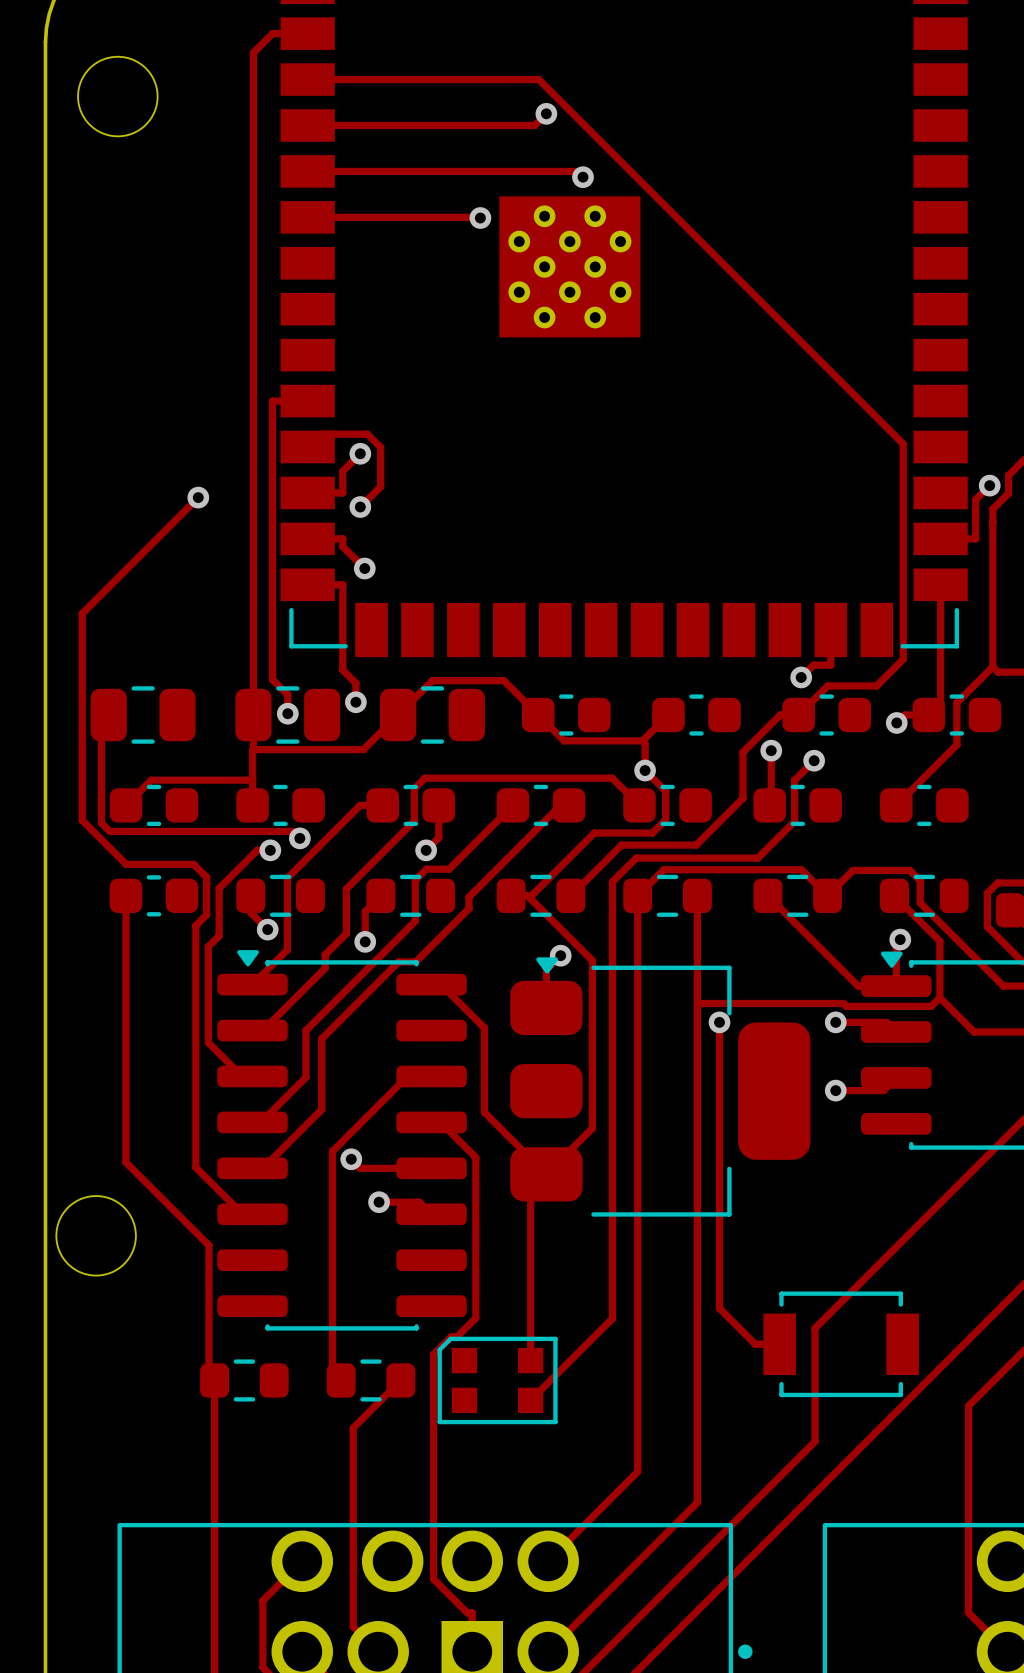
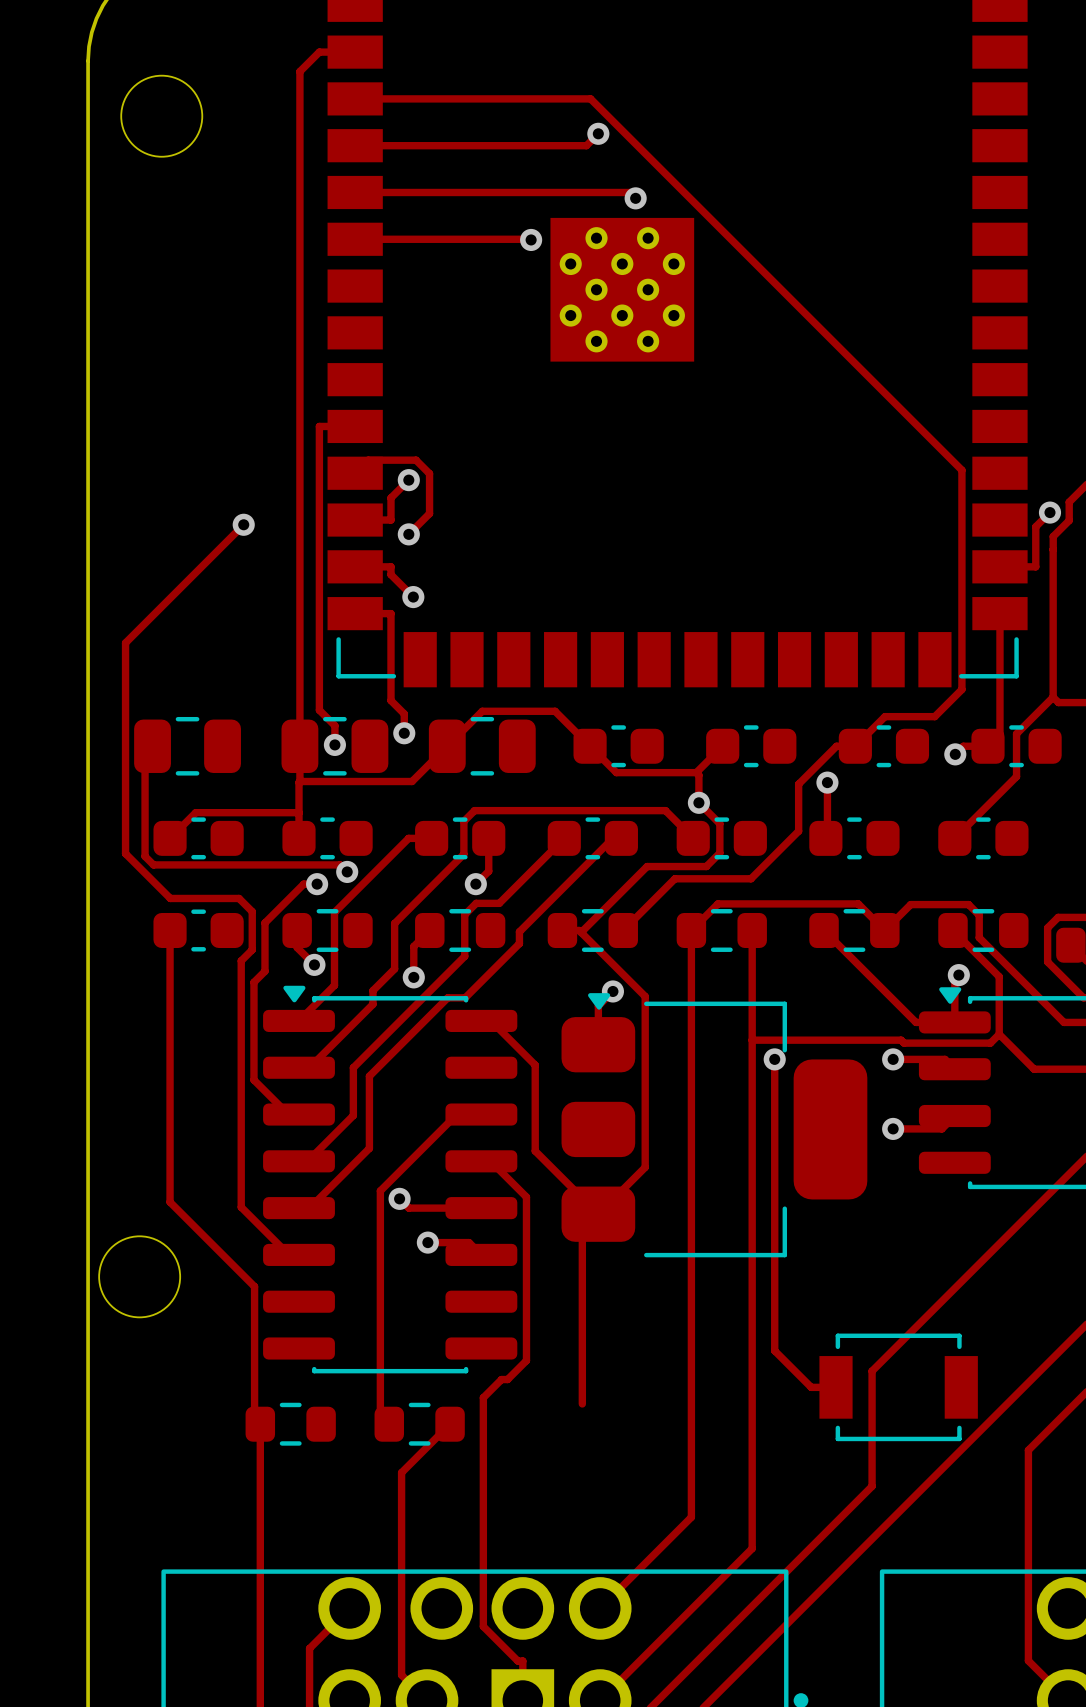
track: (830, 630) (830, 665) (813, 665) (801, 677) -> none
via: (801, 677) -> none
track: (814, 760) (794, 780) (794, 821) (757, 858) (636, 858) (612, 881) (612, 1318) (530, 1400) -> none
via: (814, 760) -> none
part: (497, 1380) -> none

